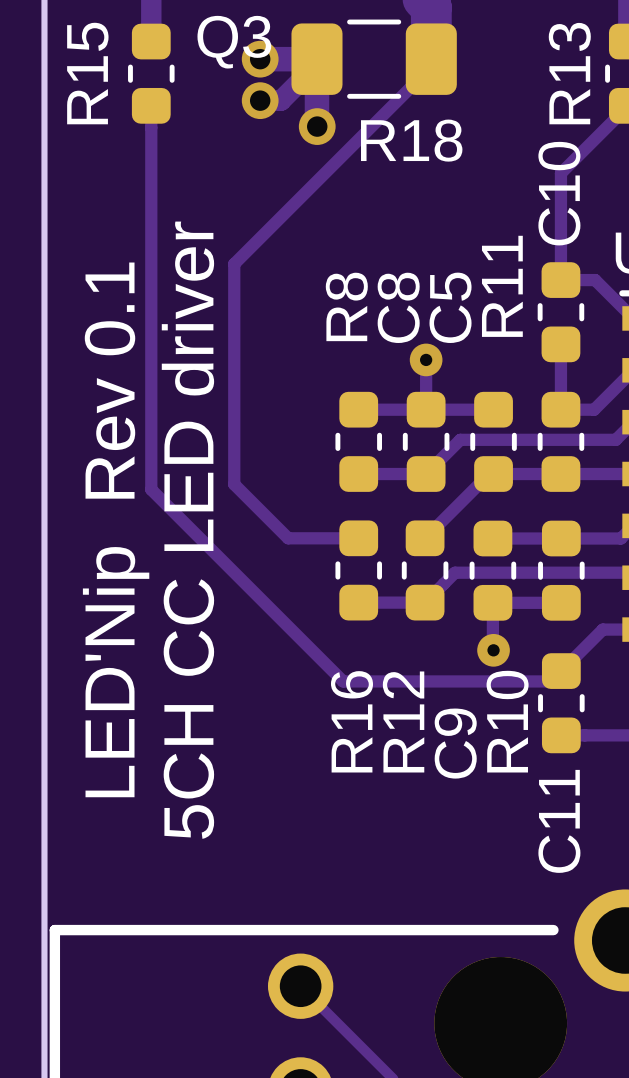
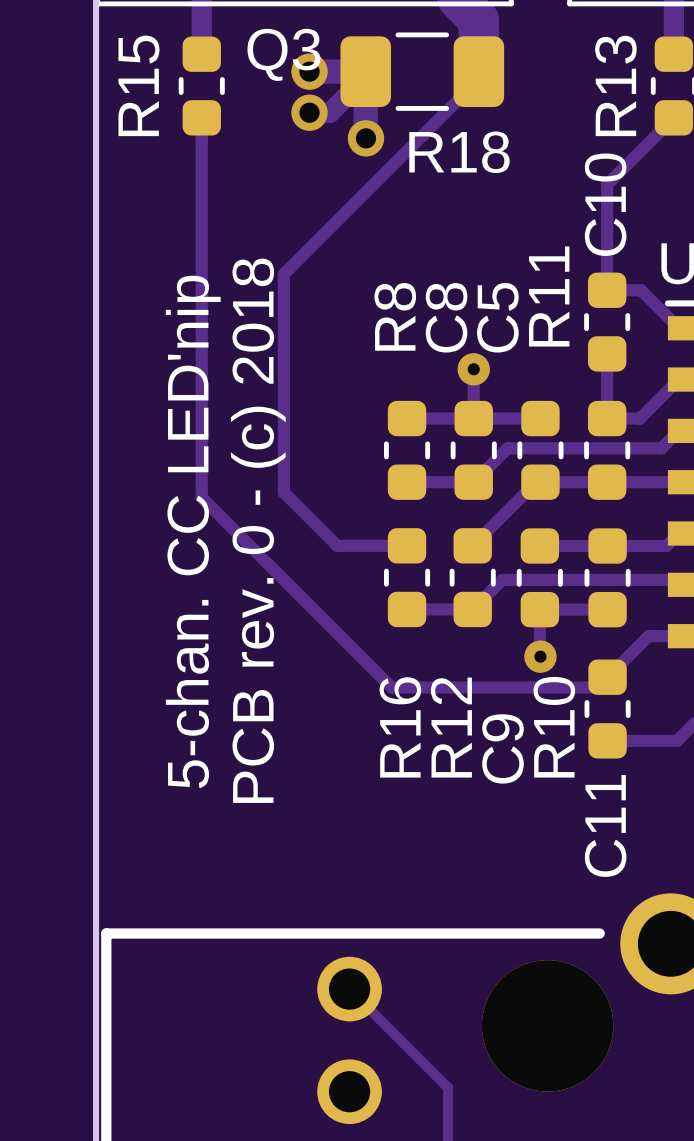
text: none -> 5-chan. CC LED'nip (193, 531)
text: LED'Nip Rev 0.1 (116, 529) -> none
text: 5CH CC LED driver (187, 530) -> PCB rev. 0 - (c) 2018 (258, 530)

